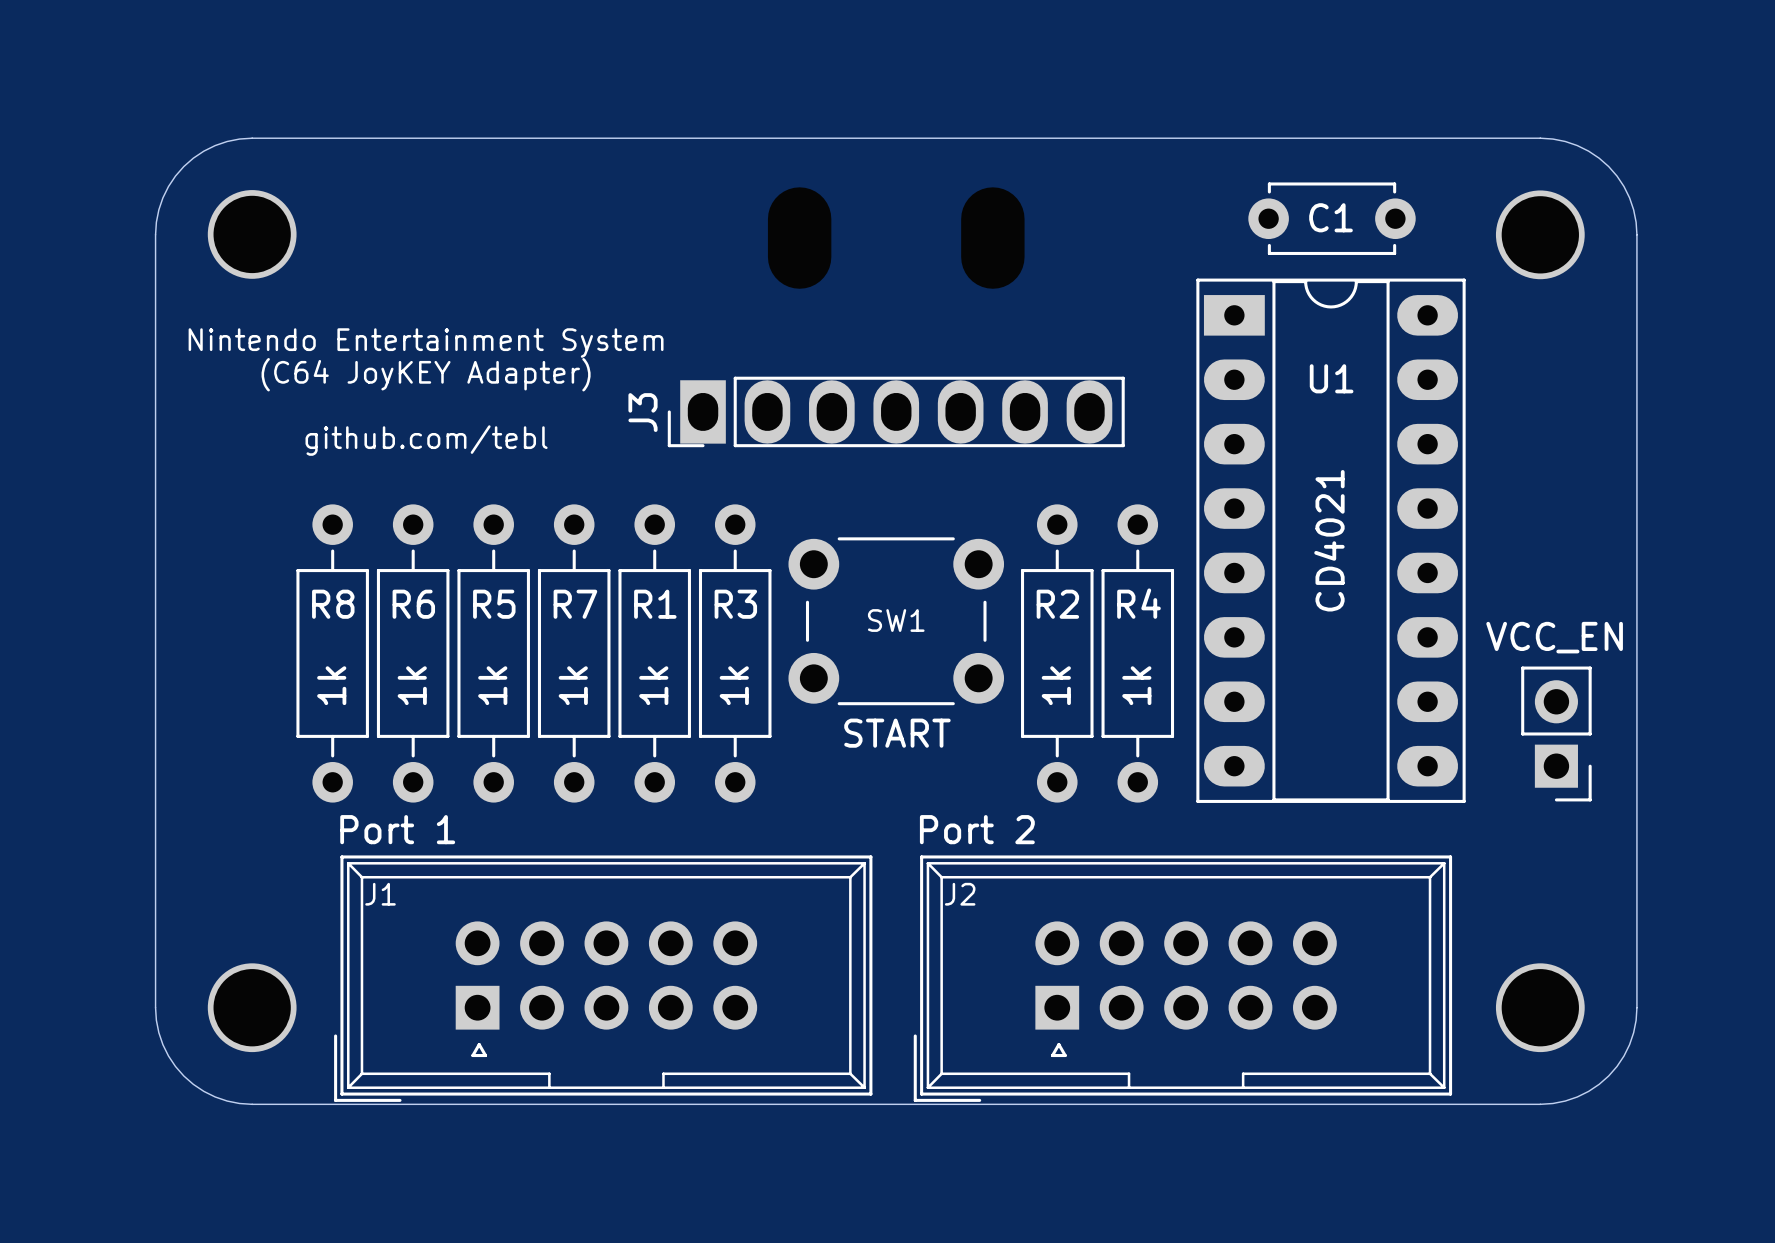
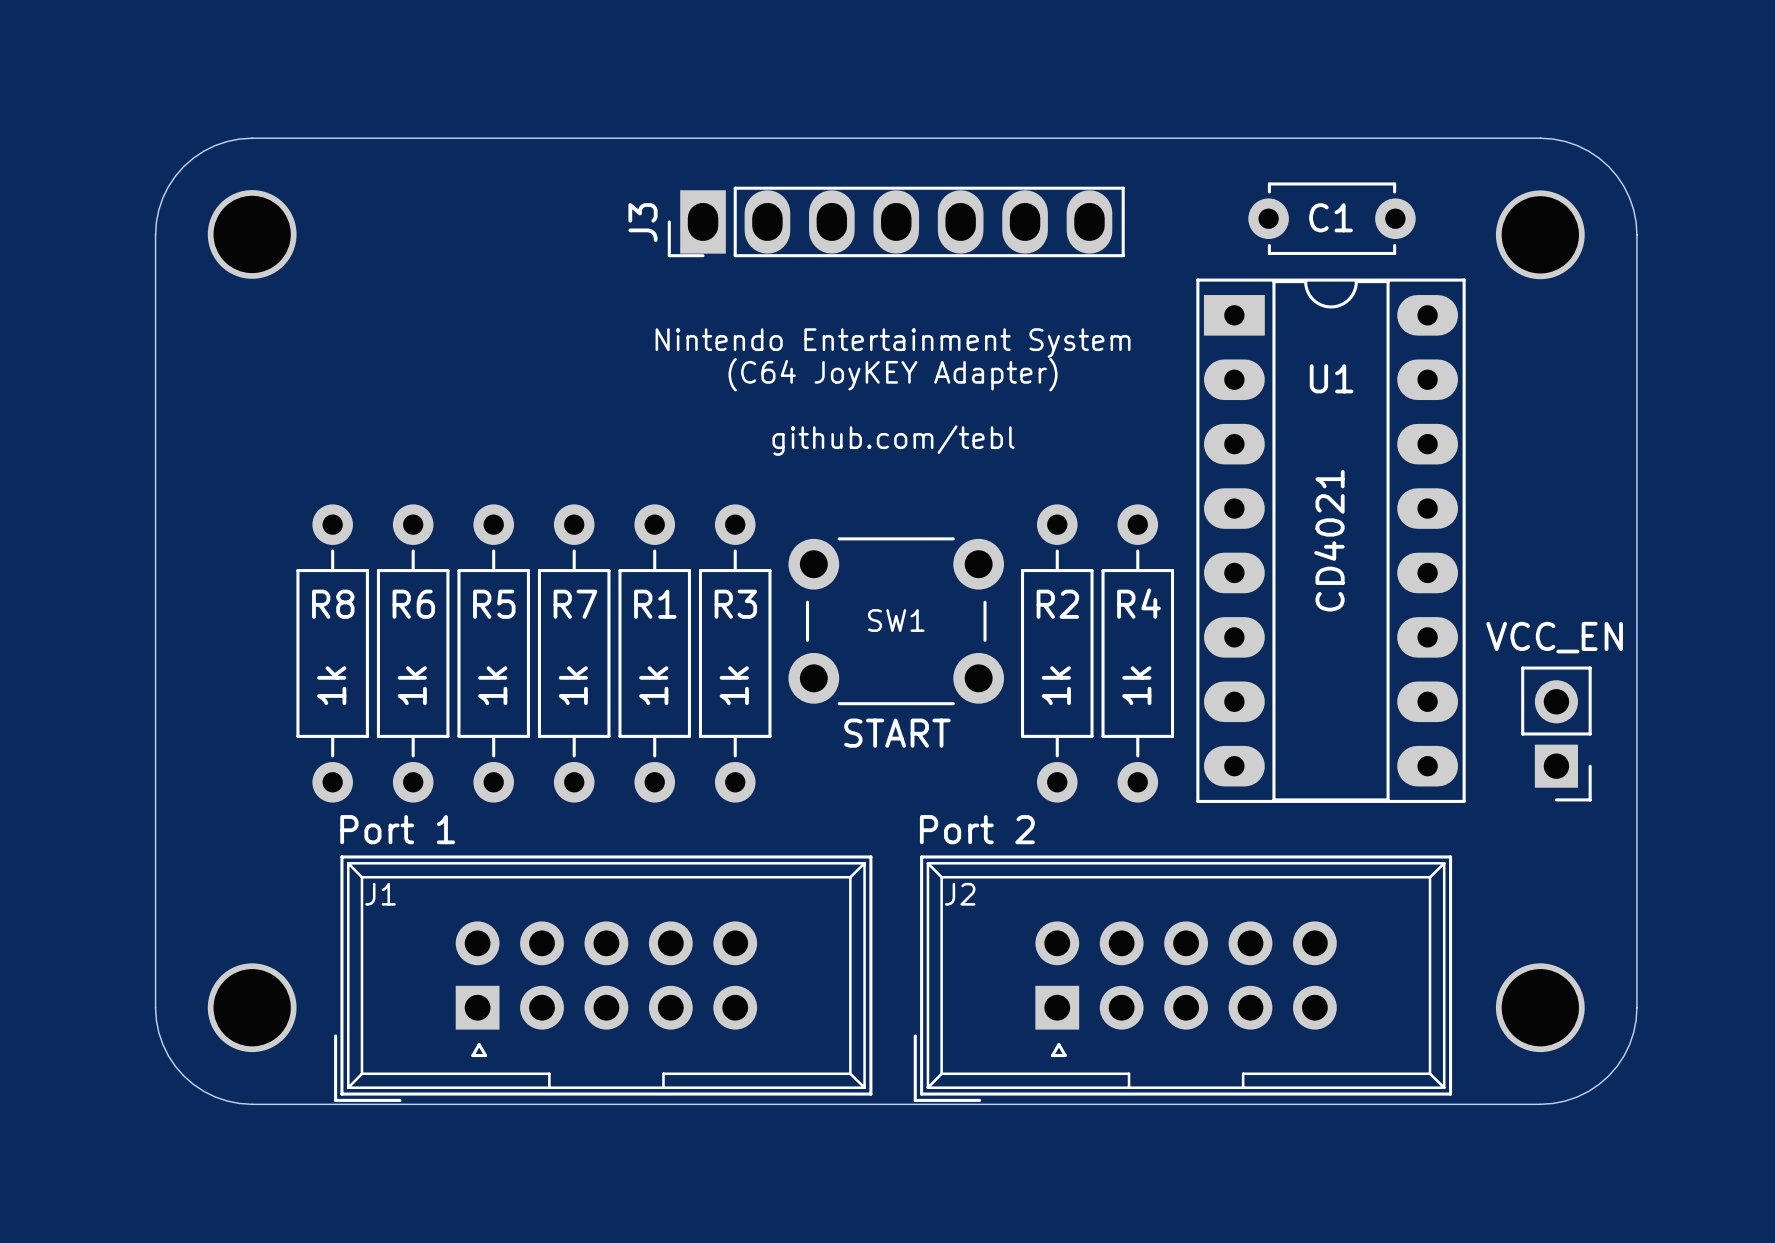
J3 footprint: [667, 187, 1125, 448] -> [667, 186, 1125, 258]
text position: Nintendo Entertainment System (426, 343) -> Nintendo Entertainment System (893, 343)
text position: (C64 JoyKEY Adapter) (426, 374) -> (C64 JoyKEY Adapter) (893, 374)
J3 name position: J3 (643, 412) -> J3 (643, 222)
text position: github.com/tebl (426, 440) -> github.com/tebl (893, 440)

